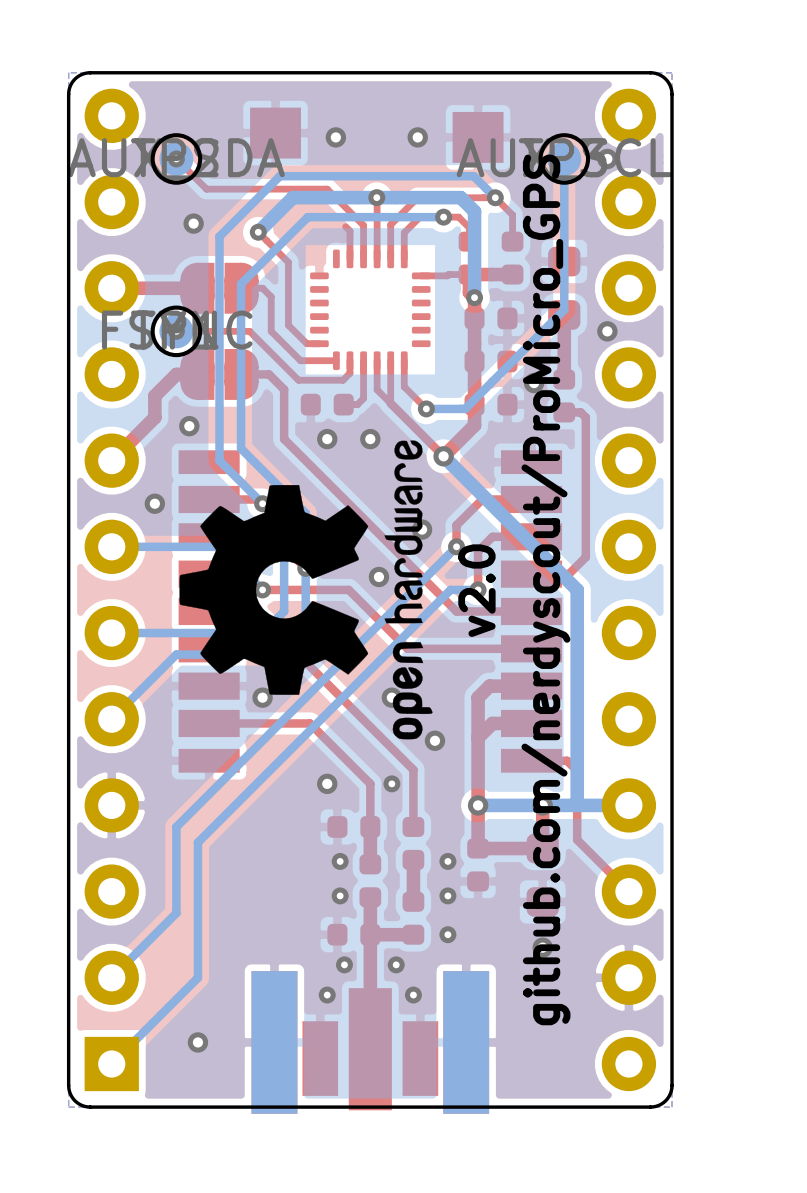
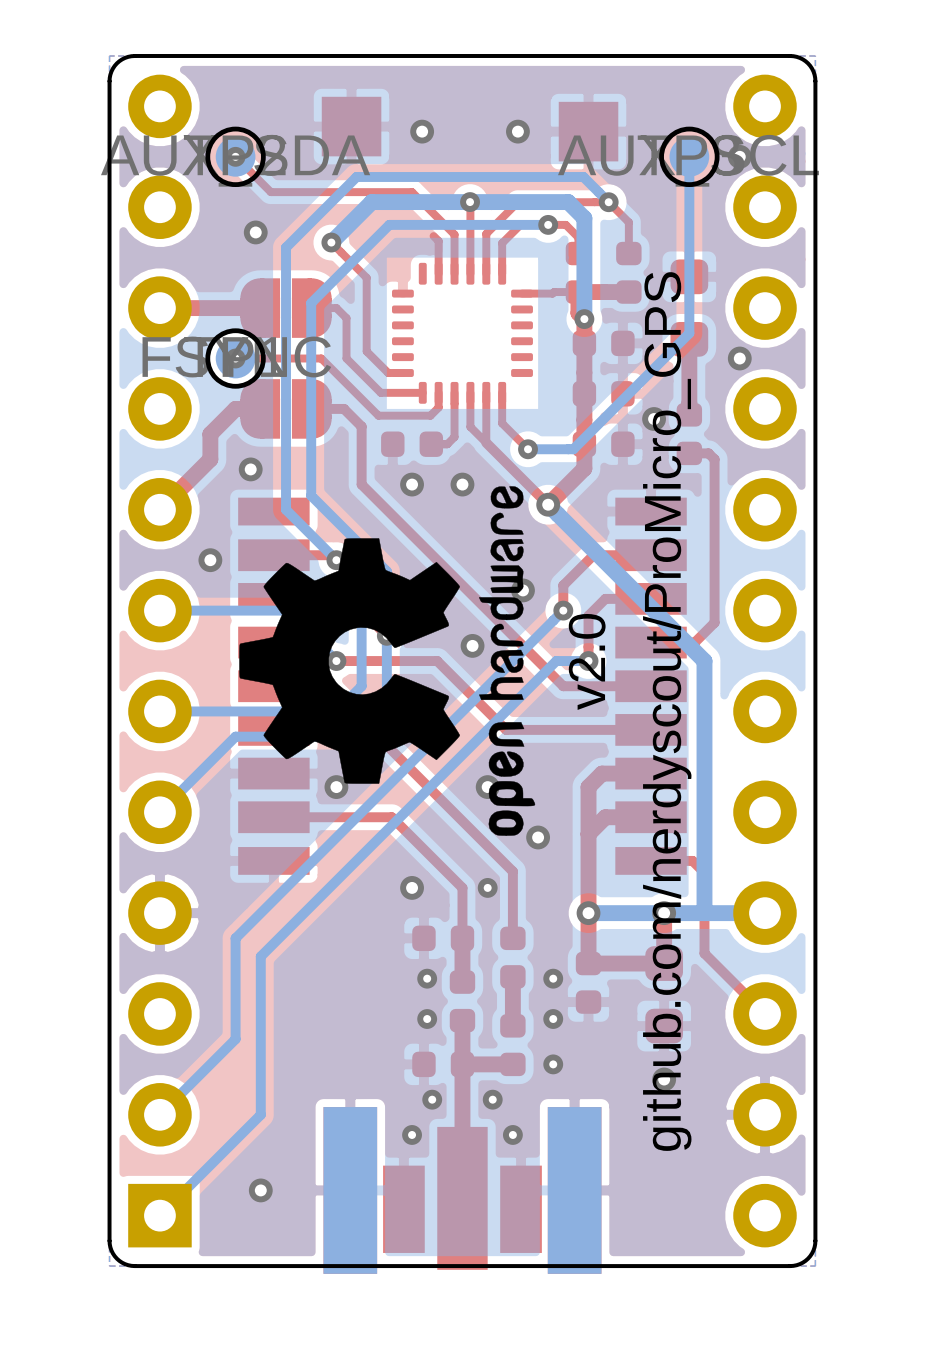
text position: github.com/nerdyscout/ProMicro_GPS (545, 589) -> github.com/nerdyscout/ProMicro_GPS (667, 711)

